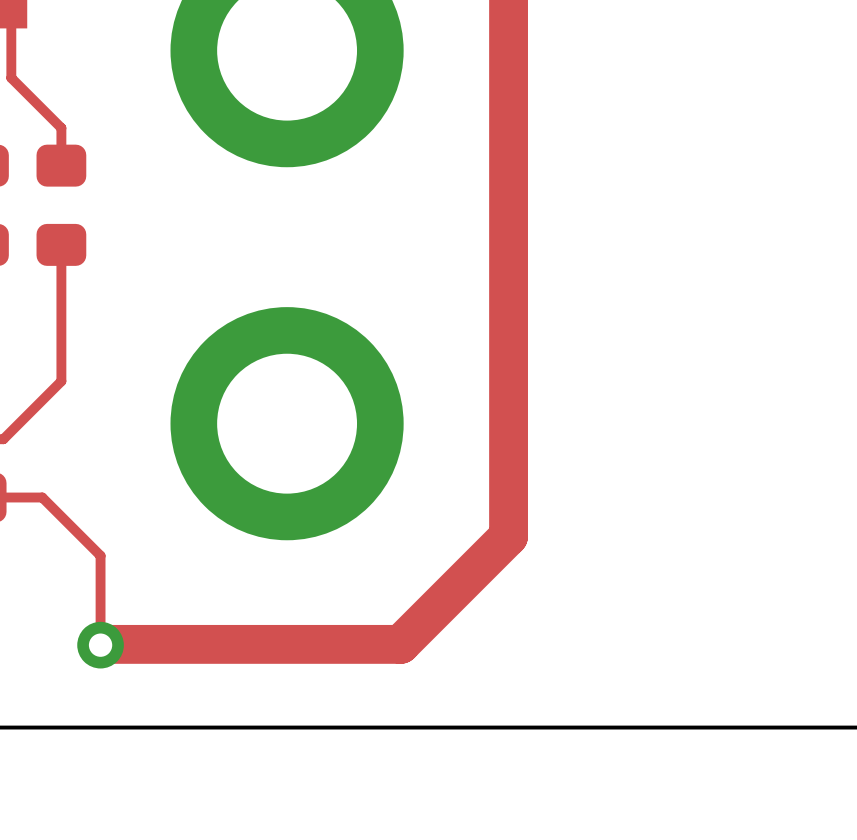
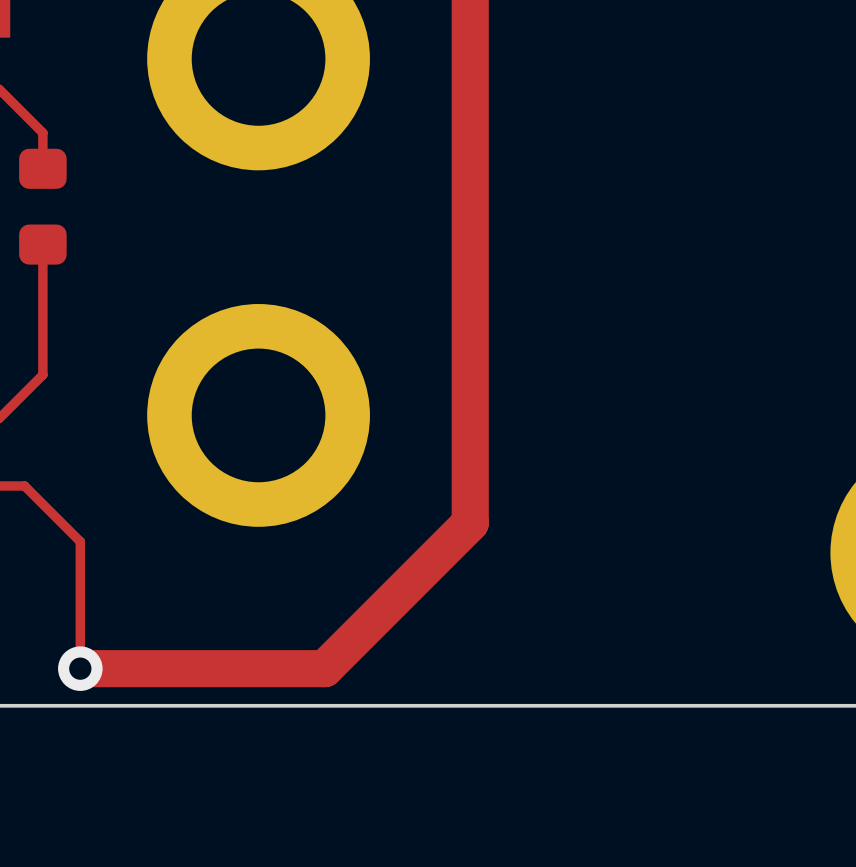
top track: (400, 644) (101, 644) -> (366, 626) (324, 668) (80, 668) (80, 627)
via position: (100, 645) -> (80, 668)

